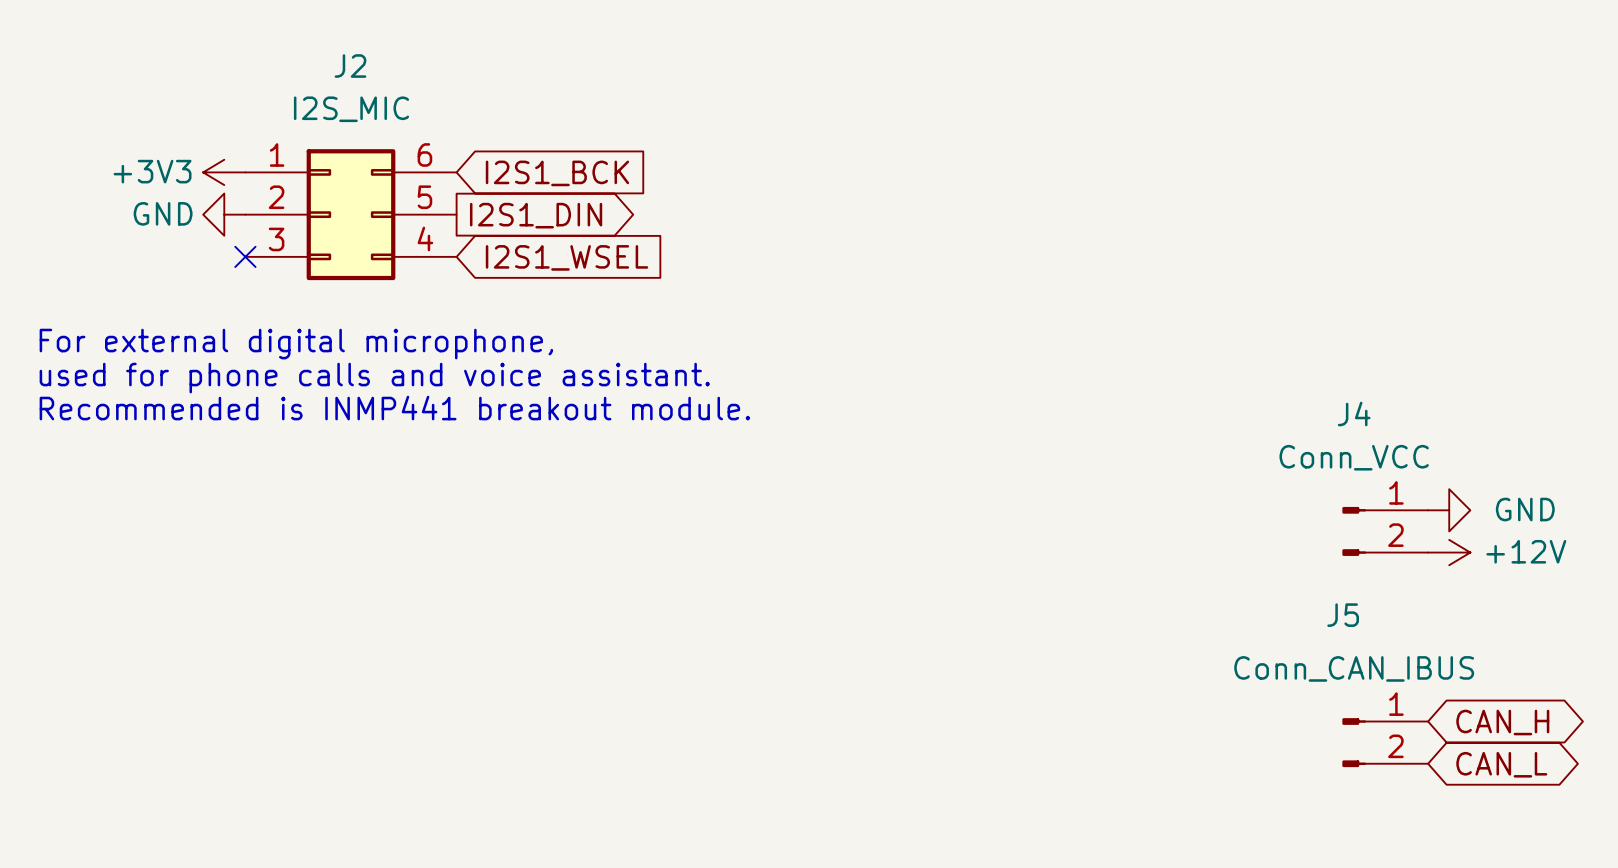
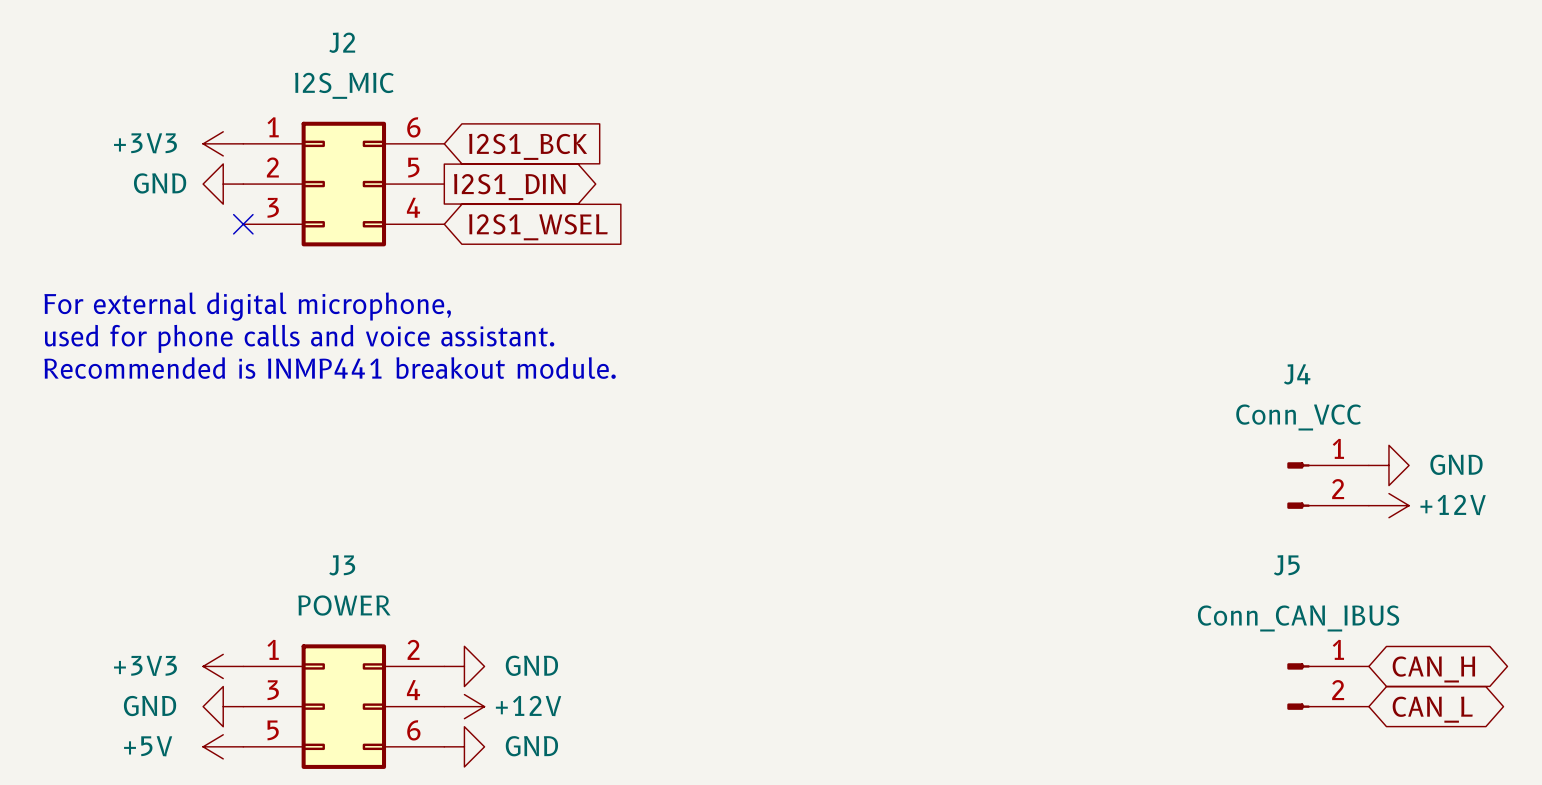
power symbol: none -> +3V3 (223, 666)
power symbol: none -> GND (464, 666)
power symbol: none -> GND (223, 706)
J3: none -> POWER (343, 706)
power symbol: none -> +12V (464, 706)
power symbol: none -> +5V (223, 746)
power symbol: none -> GND (464, 746)

